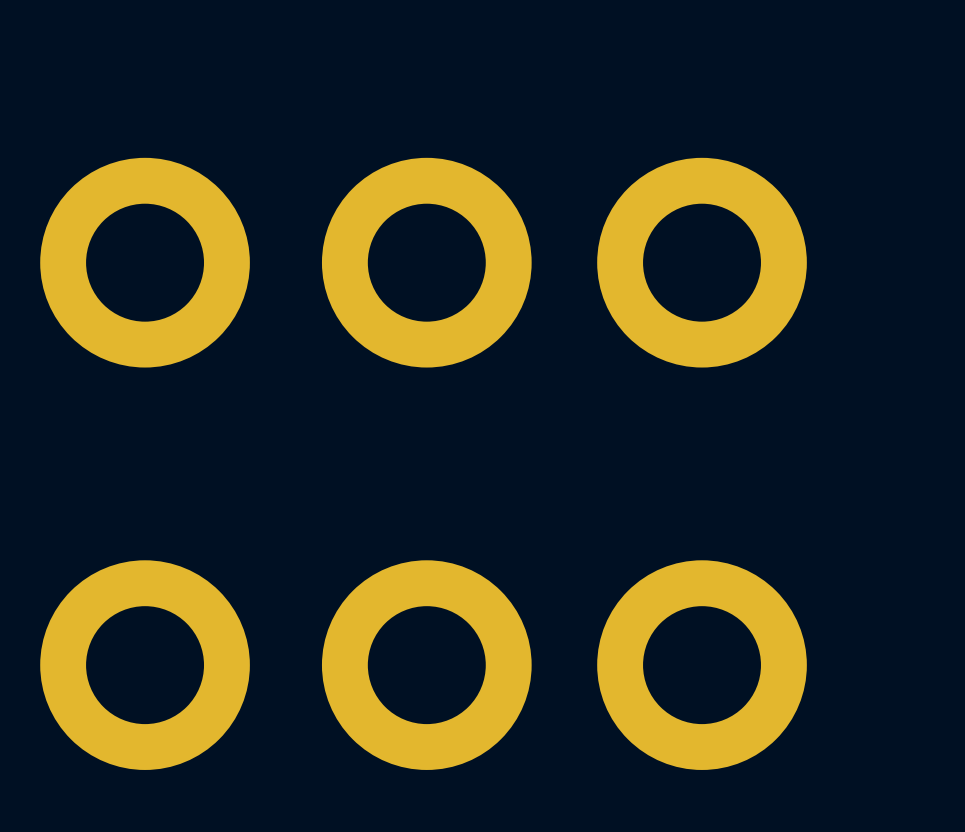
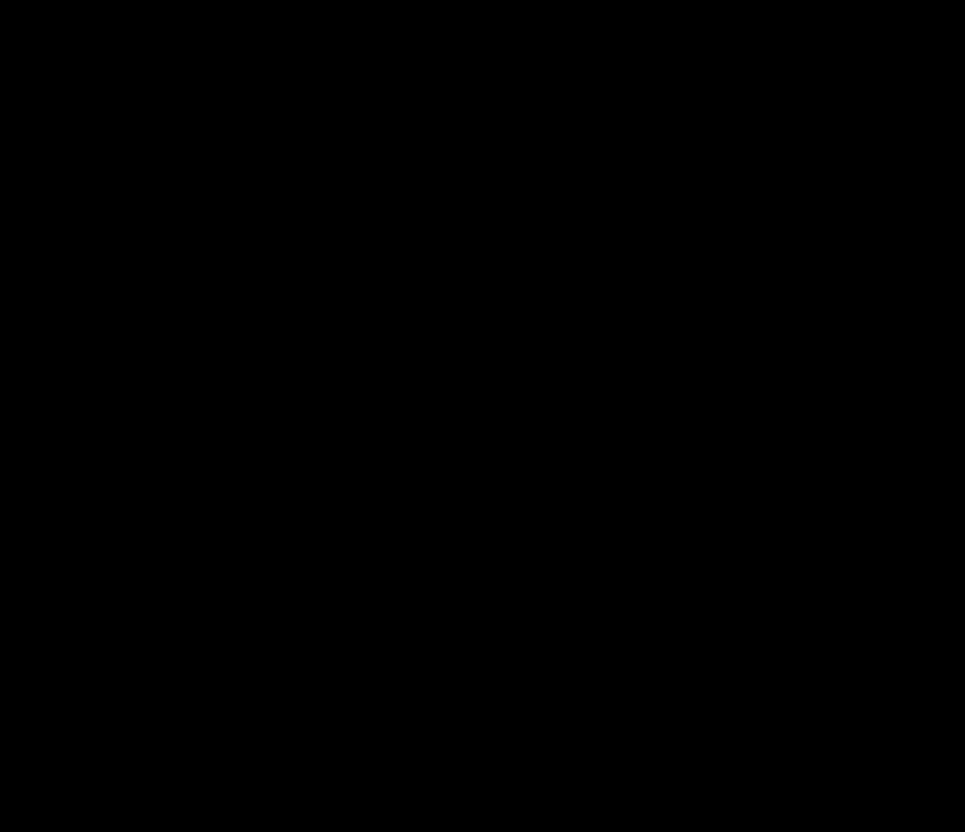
part: (423, 262) -> none
part: (423, 665) -> none

